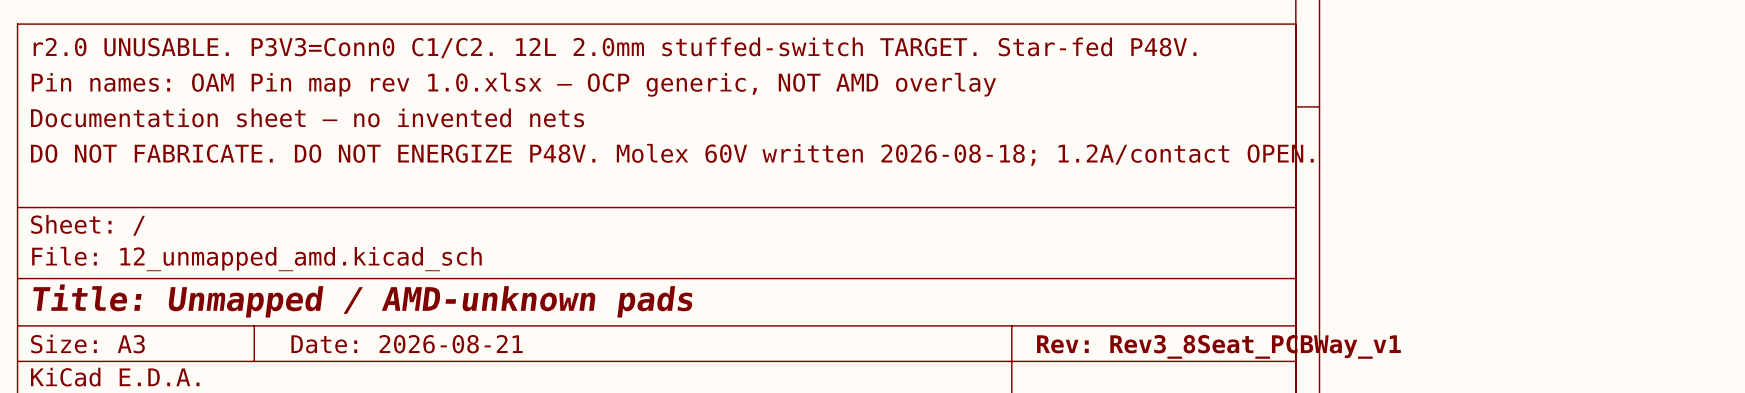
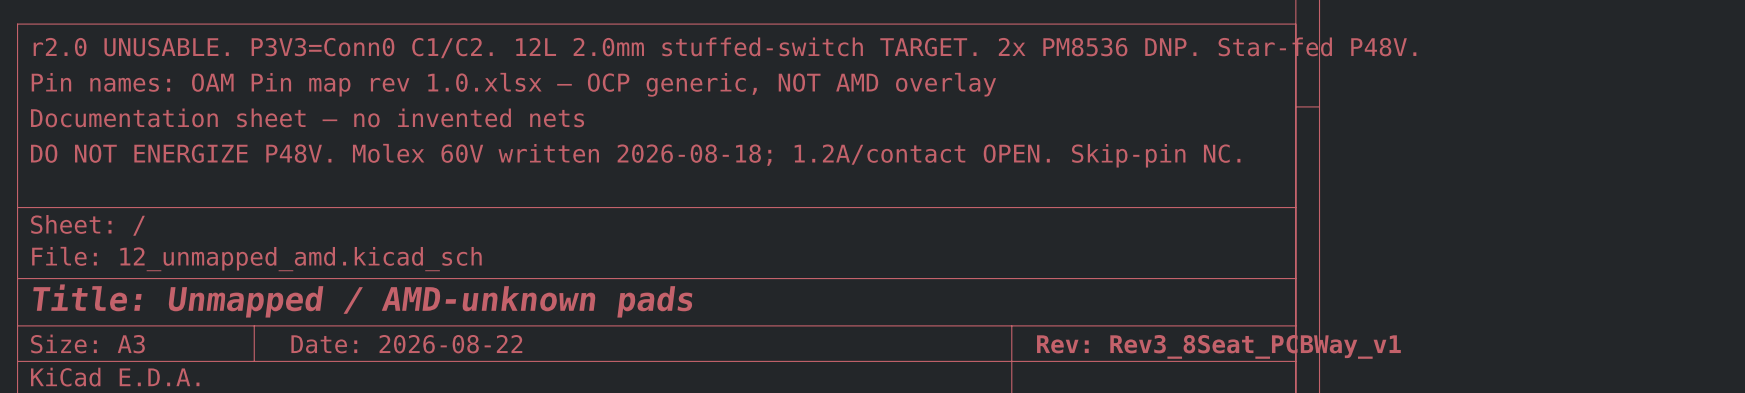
title block: r2.0 UNUSABLE. P3V3=Conn0 C1/C2. 12L 2.0mm stuffed-switch TARGET. Star-fed P48V. (615, 47) -> r2.0 UNUSABLE. P3V3=Conn0 C1/C2. 12L 2.0mm stuffed-switch TARGET. 2x PM8536 DNP. Star-fed P48V. (725, 47)
title block: DO NOT FABRICATE. DO NOT ENERGIZE P48V. Molex 60V written 2026-08-18; 1.2A/contact OPEN. (672, 154) -> DO NOT ENERGIZE P48V. Molex 60V written 2026-08-18; 1.2A/contact OPEN. Skip-pin NC. (635, 155)
title block: Date: 2026-08-21 (407, 344) -> Date: 2026-08-22 (406, 344)

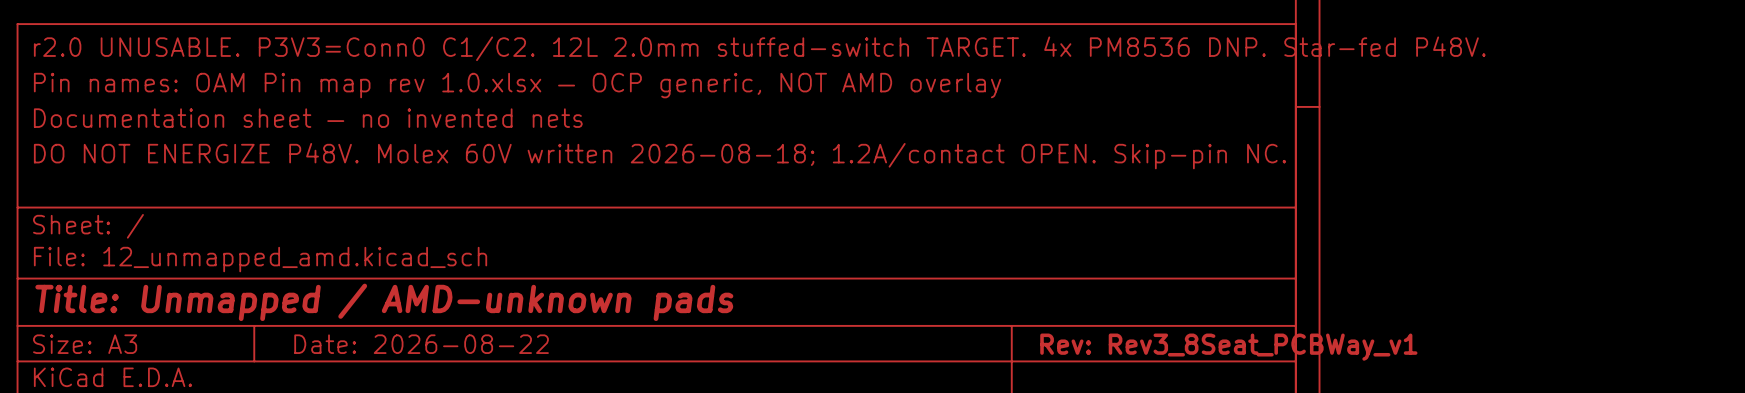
title block: r2.0 UNUSABLE. P3V3=Conn0 C1/C2. 12L 2.0mm stuffed-switch TARGET. 2x PM8536 DNP. Star-fed P48V. (725, 47) -> r2.0 UNUSABLE. P3V3=Conn0 C1/C2. 12L 2.0mm stuffed-switch TARGET. 4x PM8536 DNP. Star-fed P48V. (759, 48)

